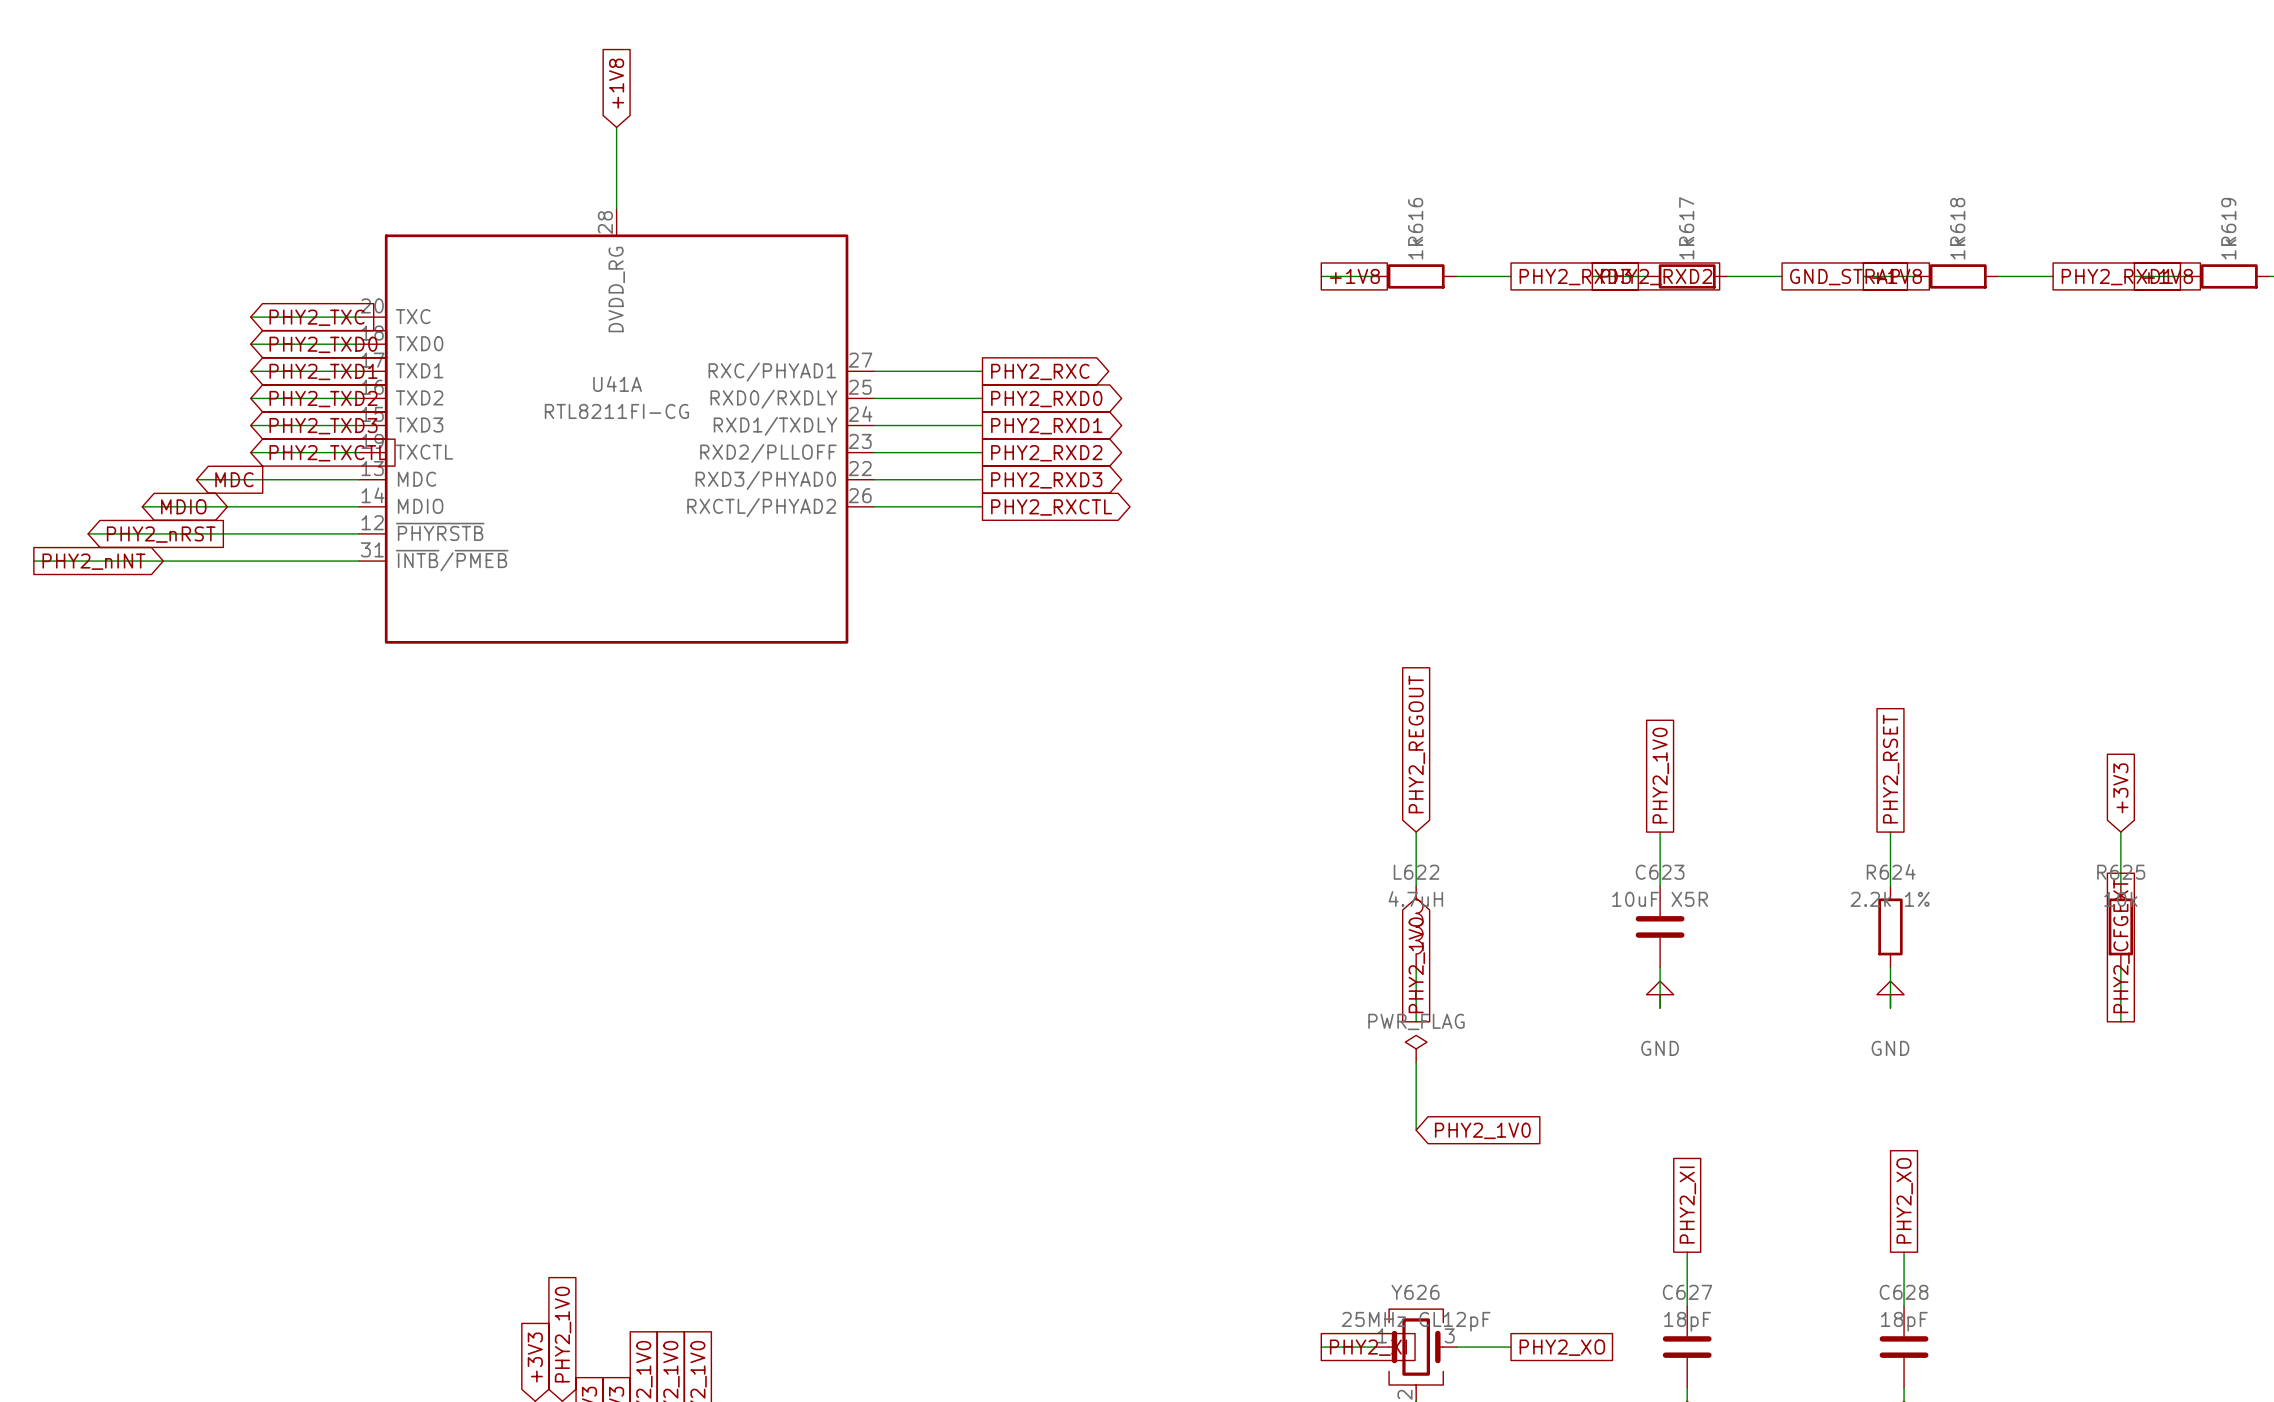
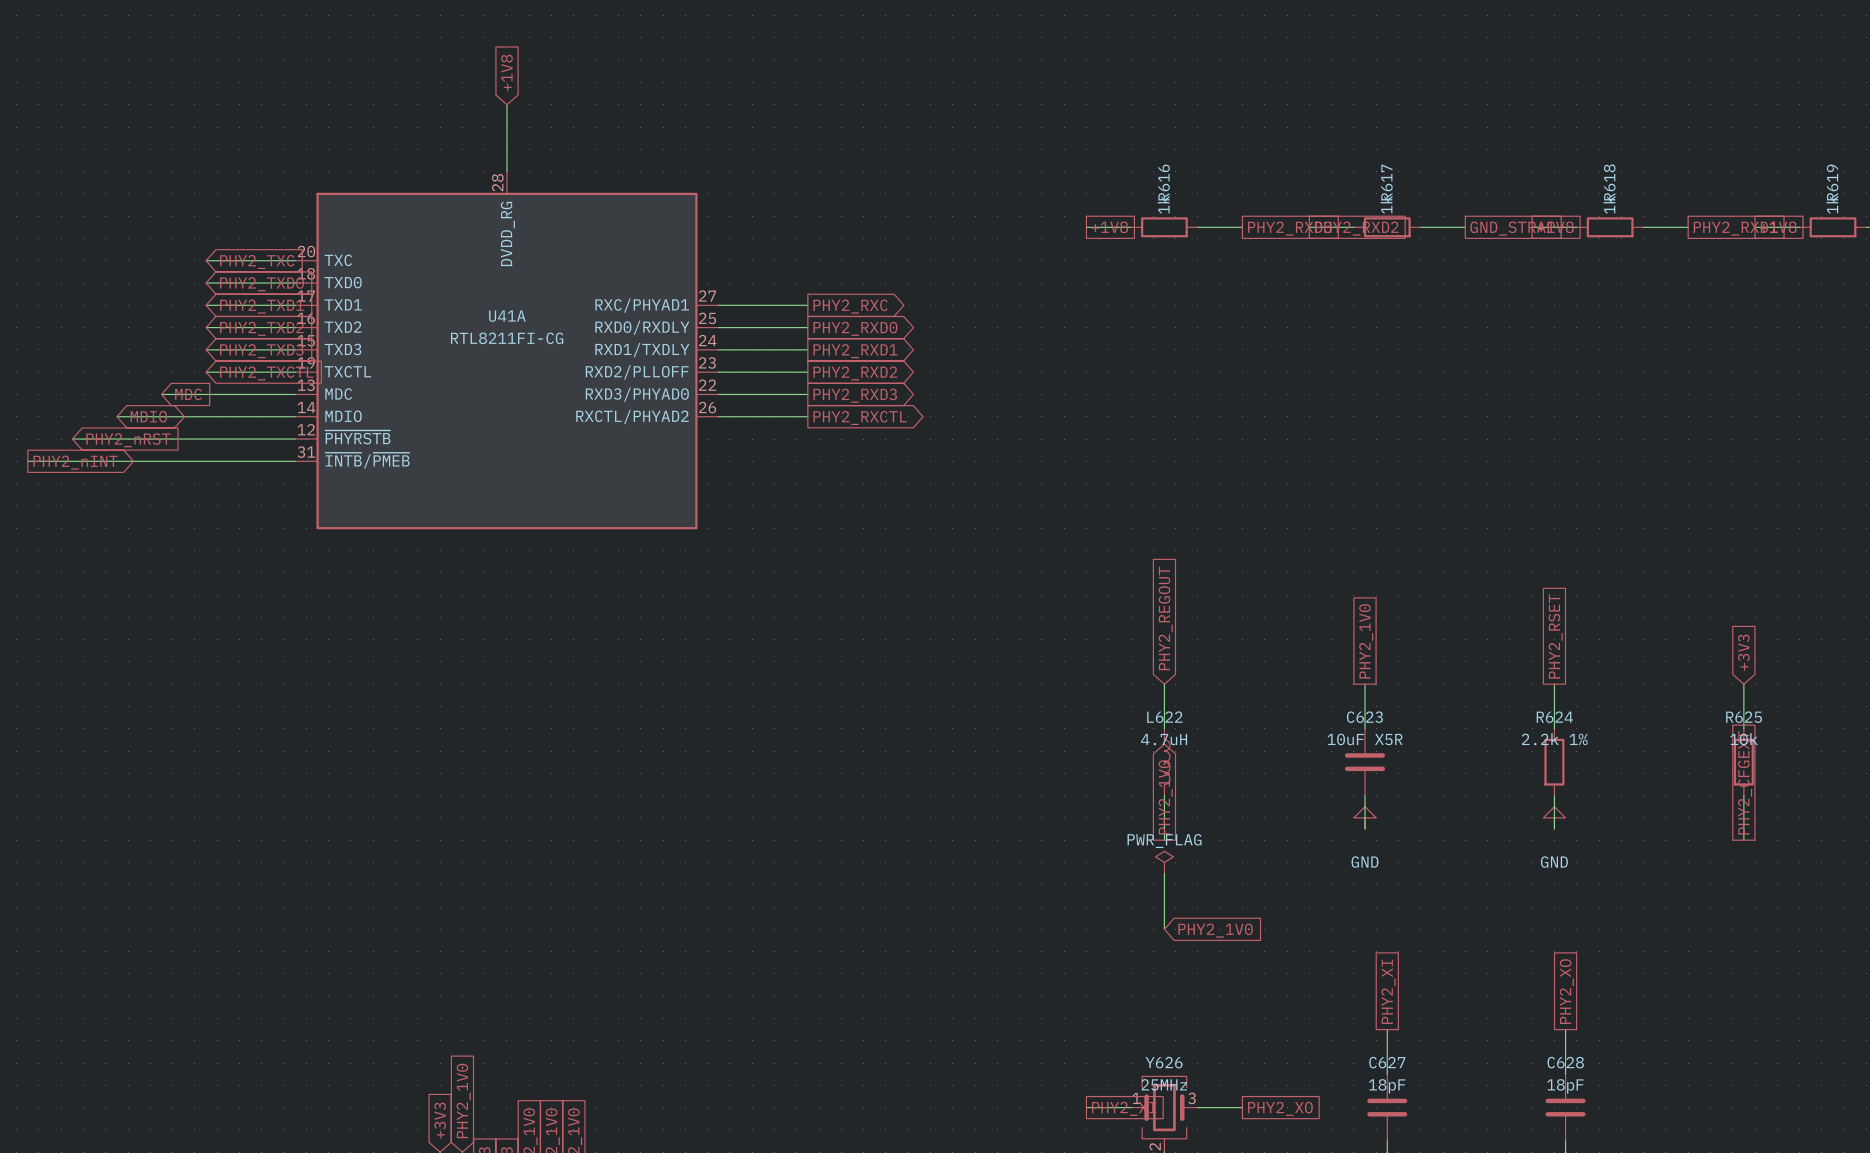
Y626 value: 25MHz CL12pF (1416, 1321) -> 25MHz (1164, 1084)

